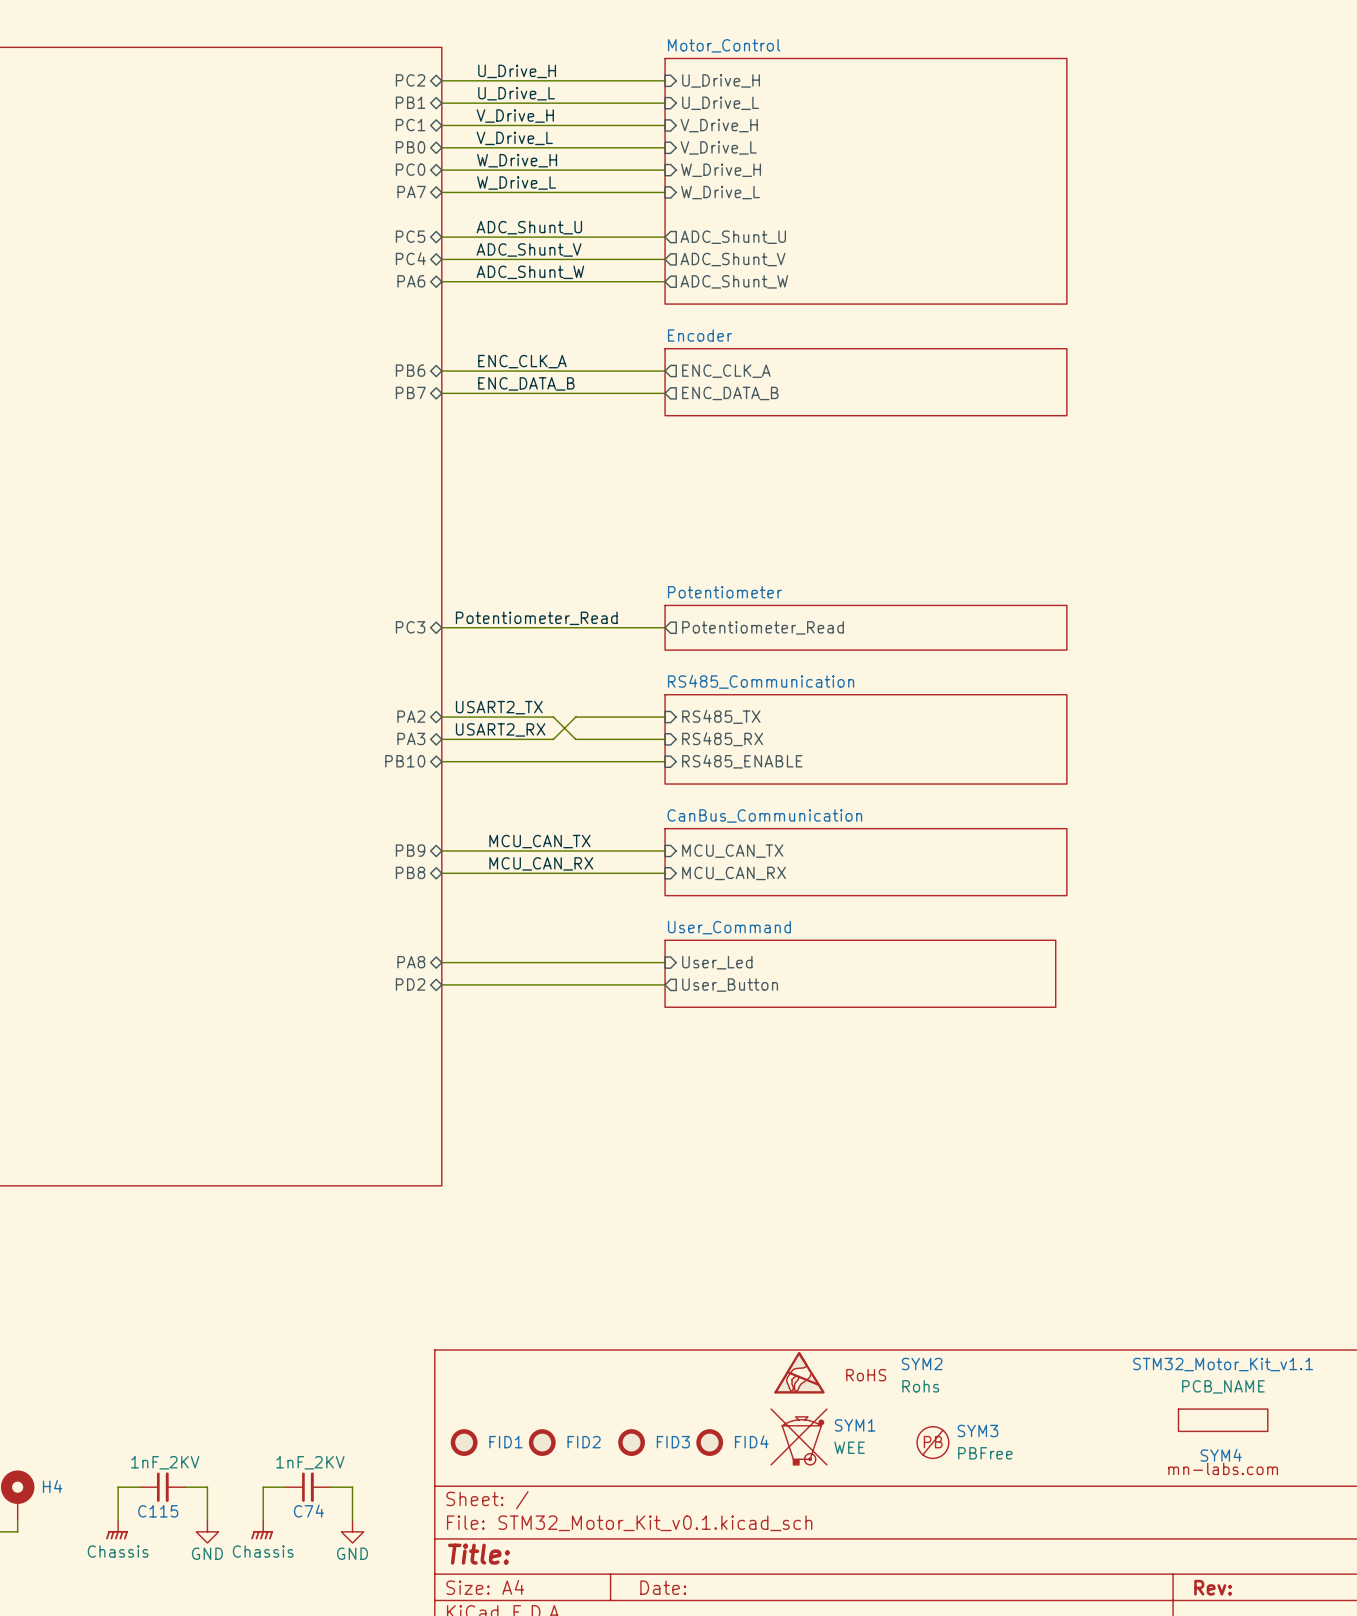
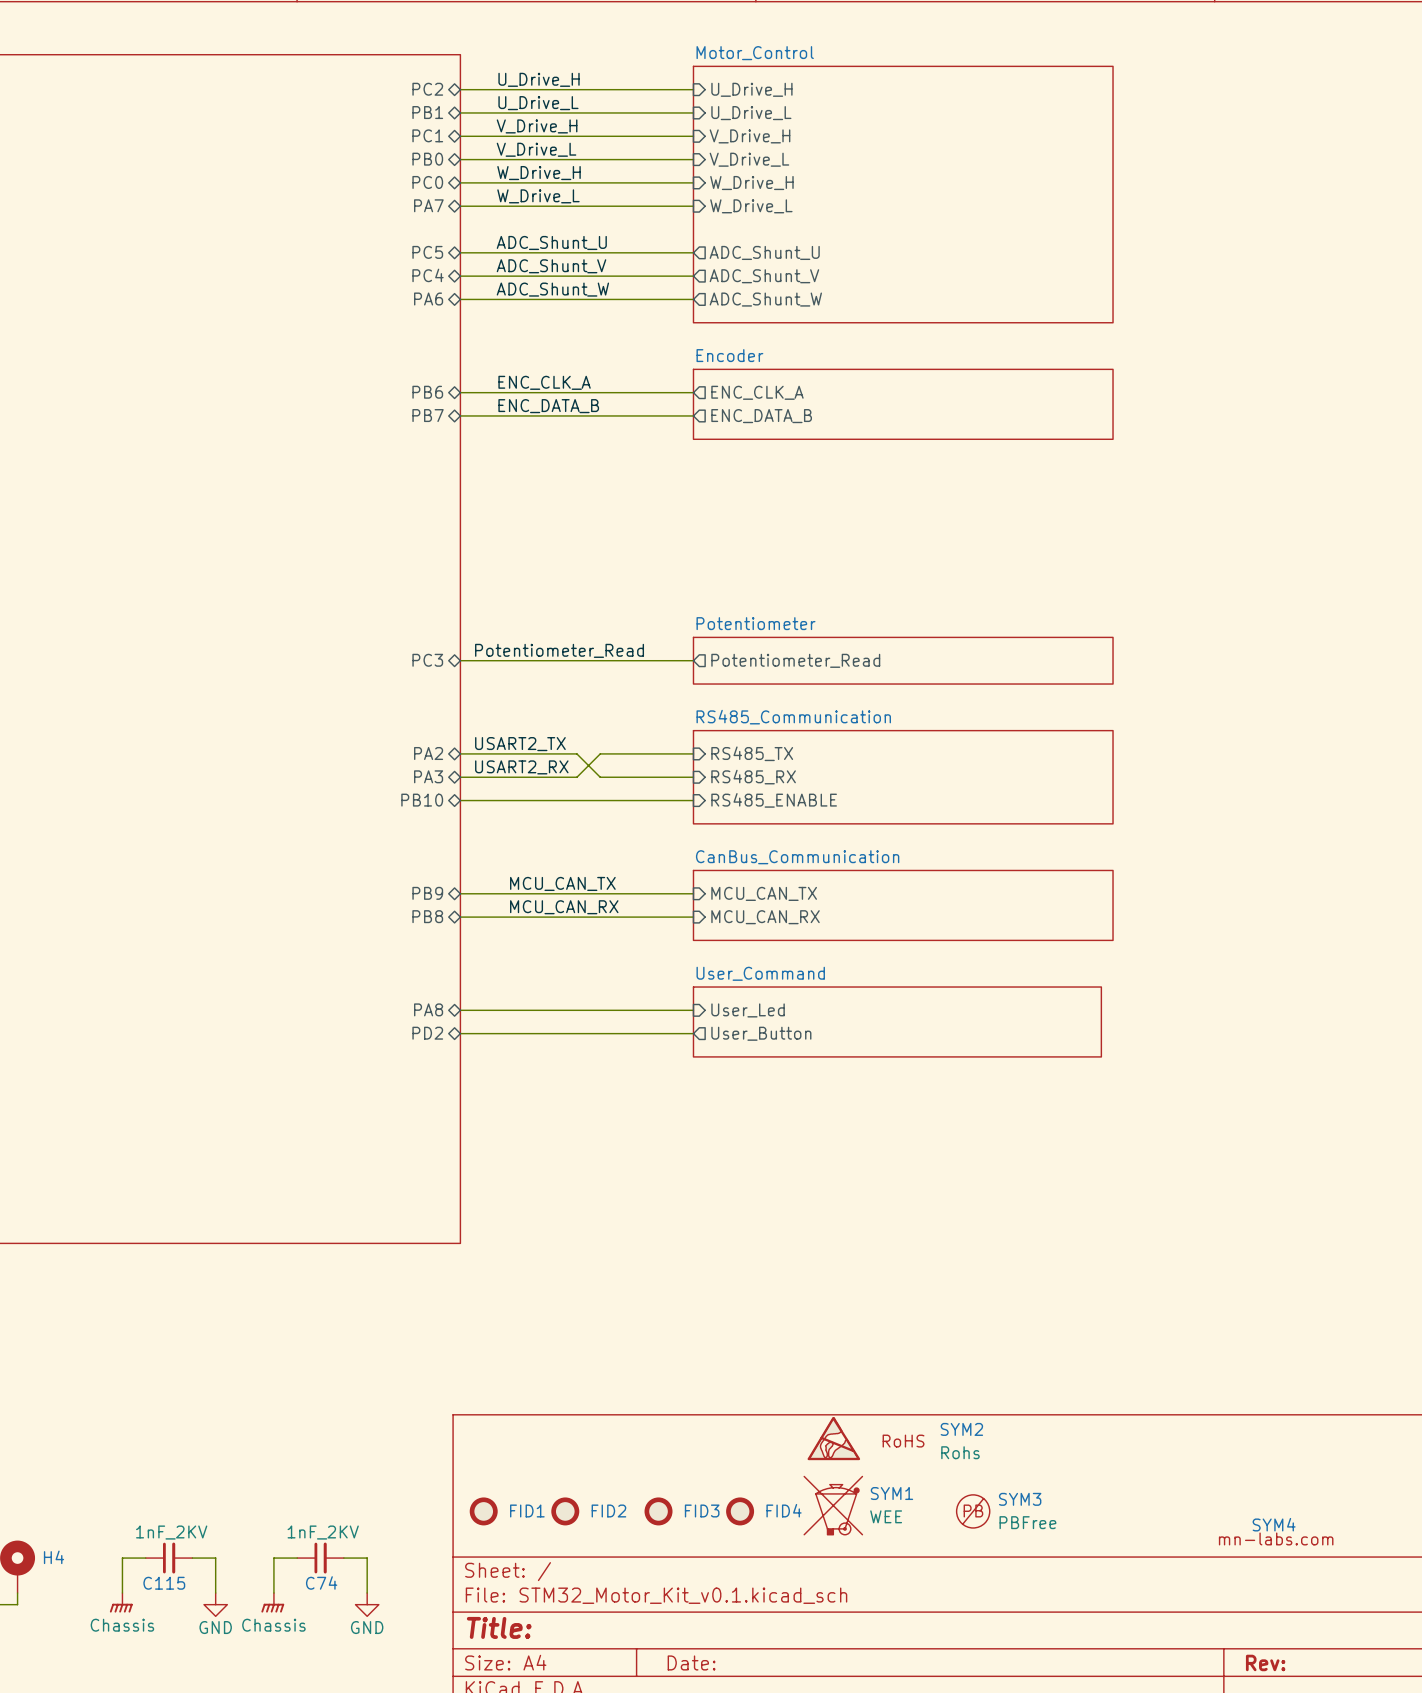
STM32_Motor_Kit_v1.1: PCB_NAME (1223, 1420) -> none

